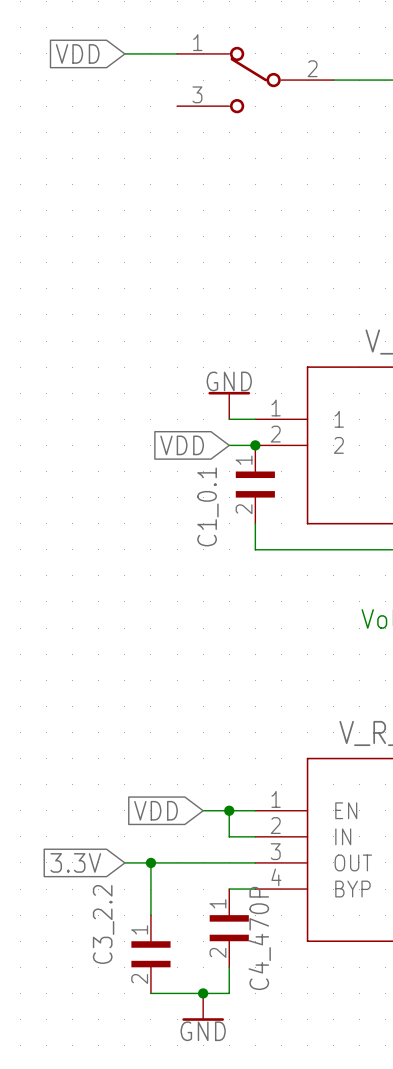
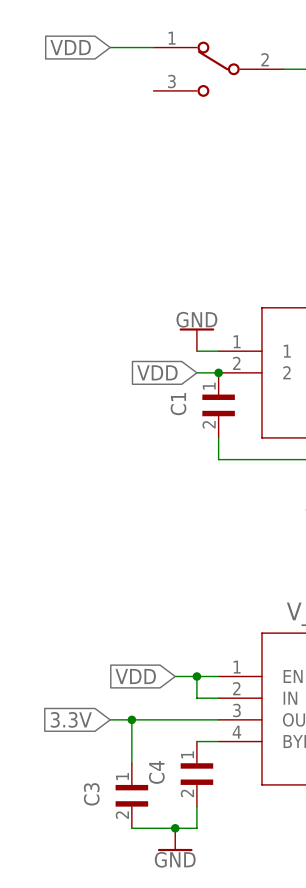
C1_0.1 name: C1_0.1 (207, 506) -> C1 (178, 404)
C3_2.2 name: C3_2.2 (103, 924) -> C3 (91, 794)
C4_470P name: C4_470P (259, 938) -> C4 (156, 772)

